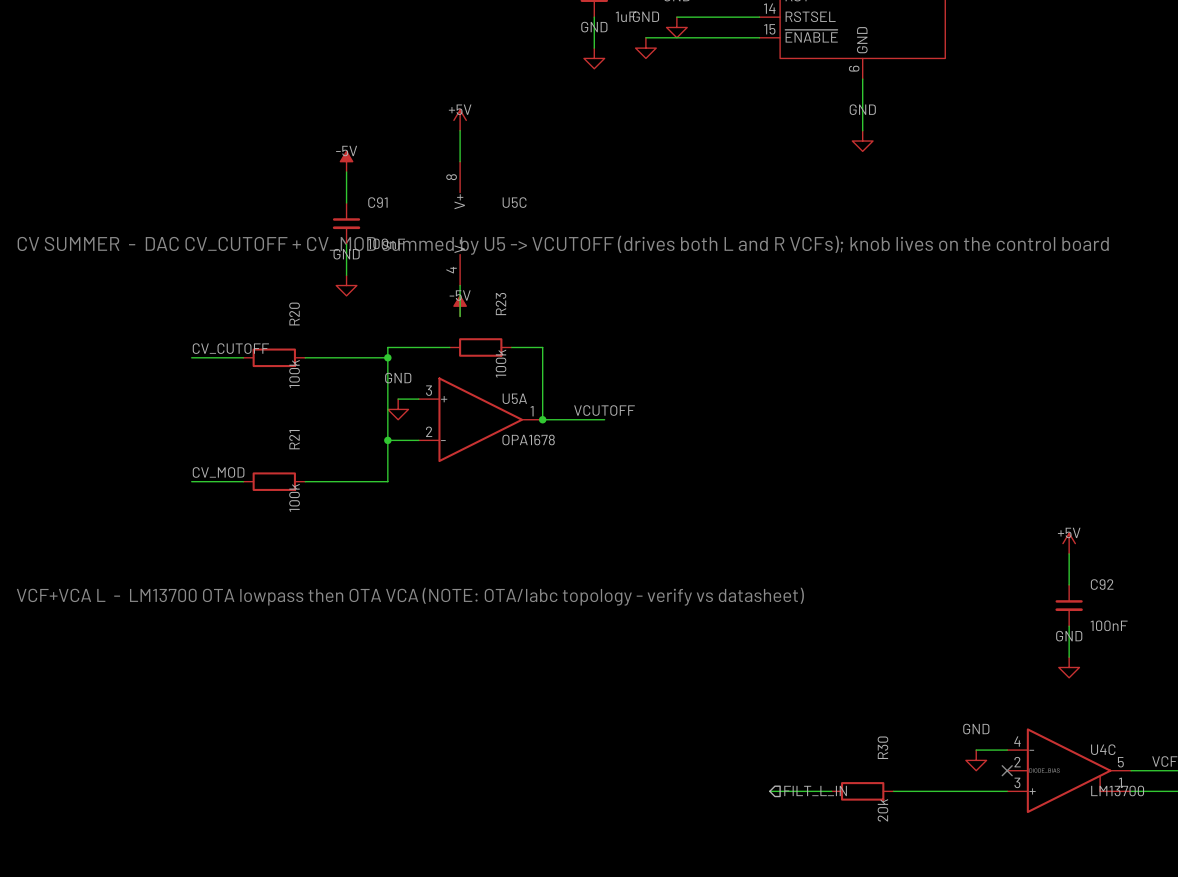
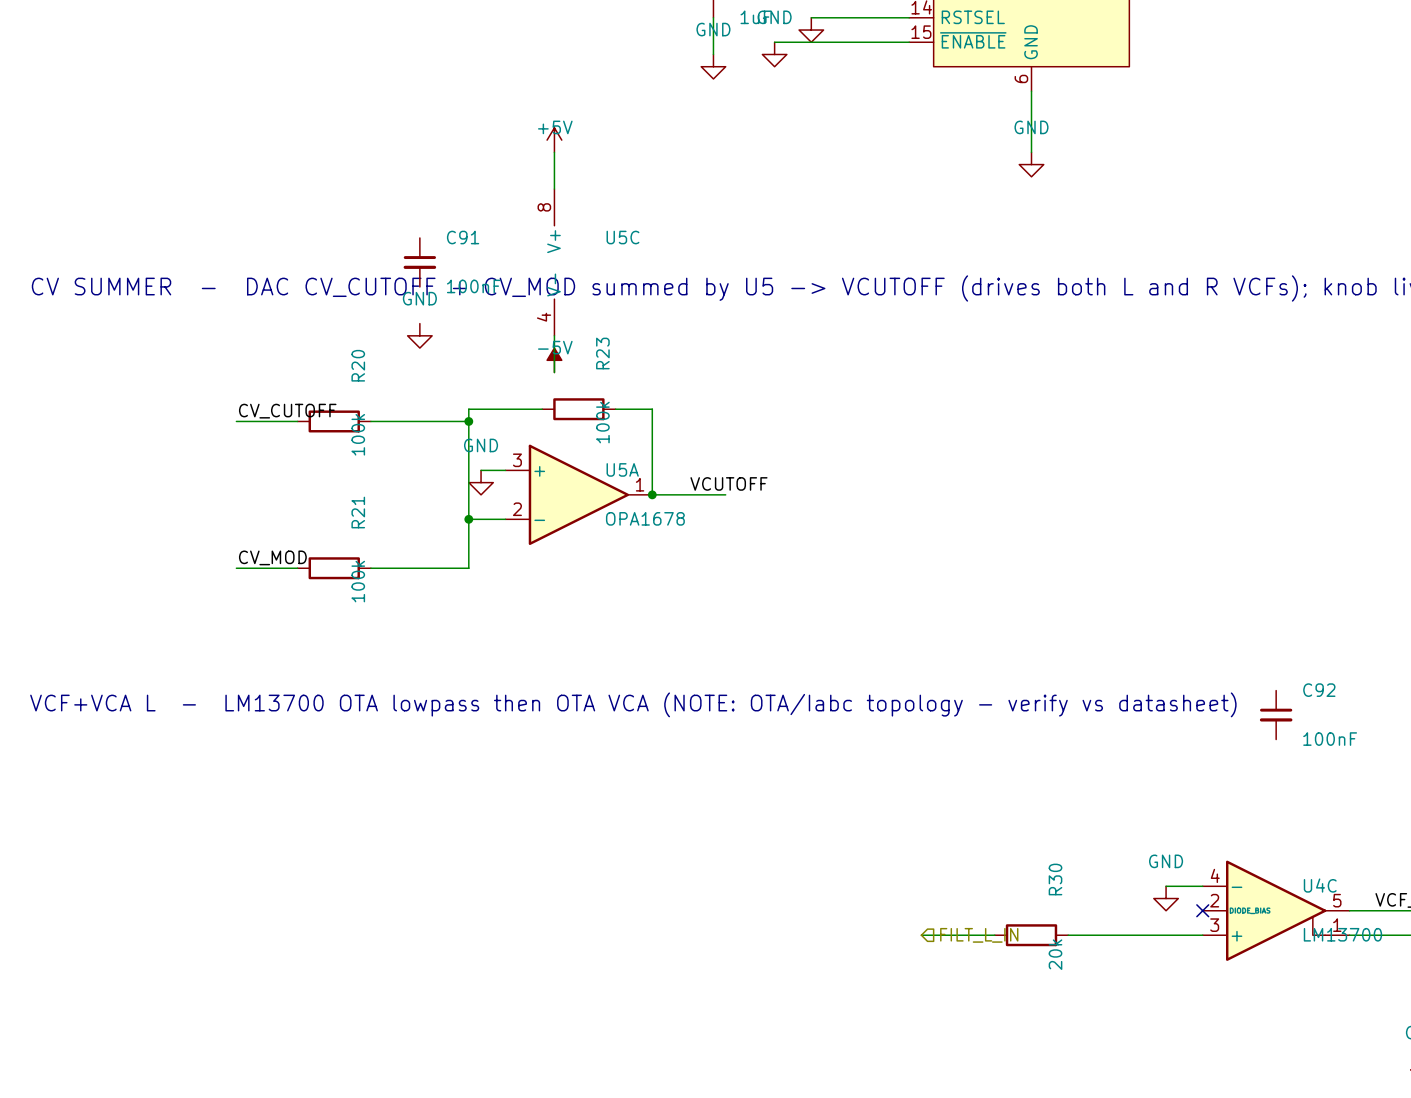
power symbol: -5V (346, 161) -> none
wire: (346, 171) (346, 202) -> none
wire: (346, 244) (346, 275) -> none
power symbol: +5V (1069, 543) -> none
wire: (1069, 553) (1069, 584) -> none
wire: (1069, 626) (1069, 657) -> none
power symbol: GND (1069, 667) -> none

